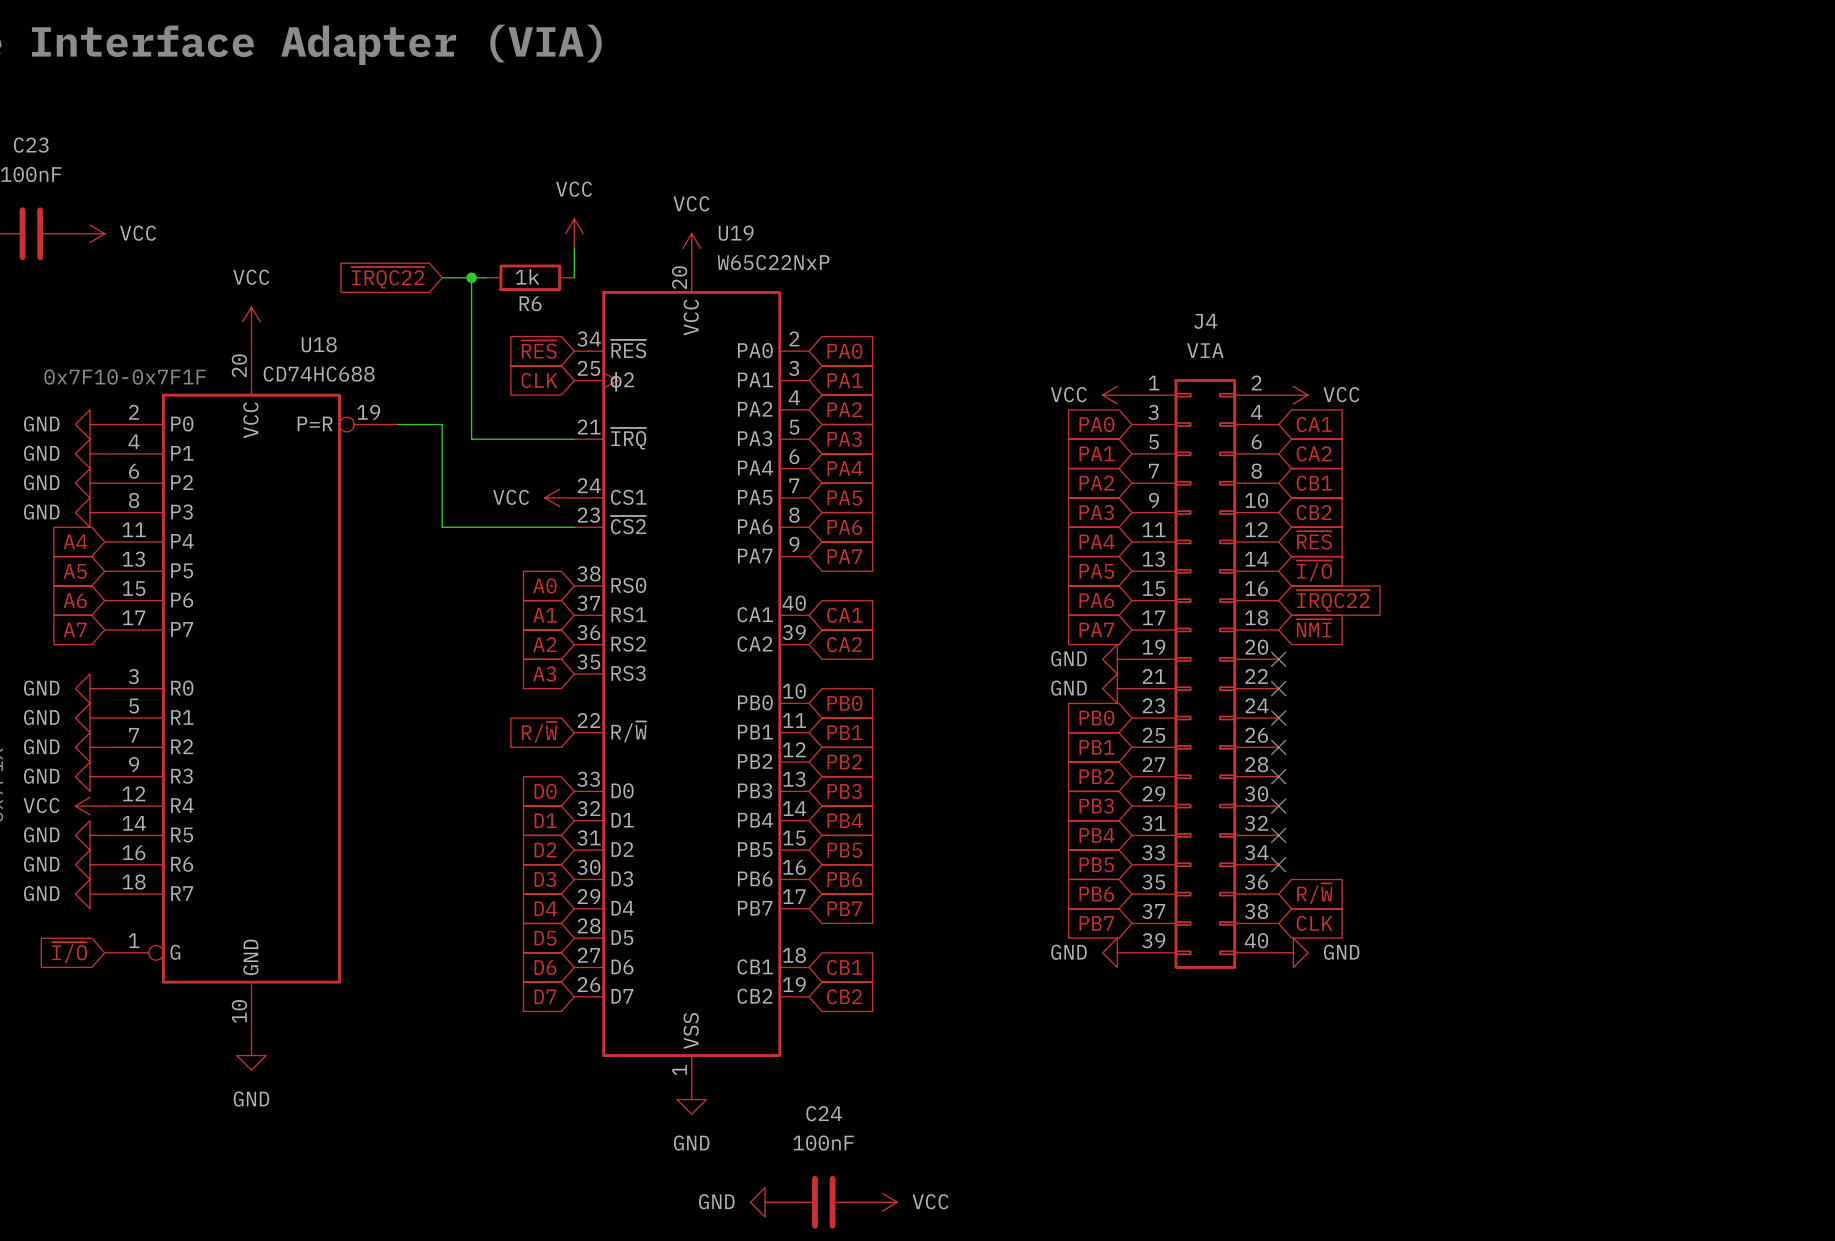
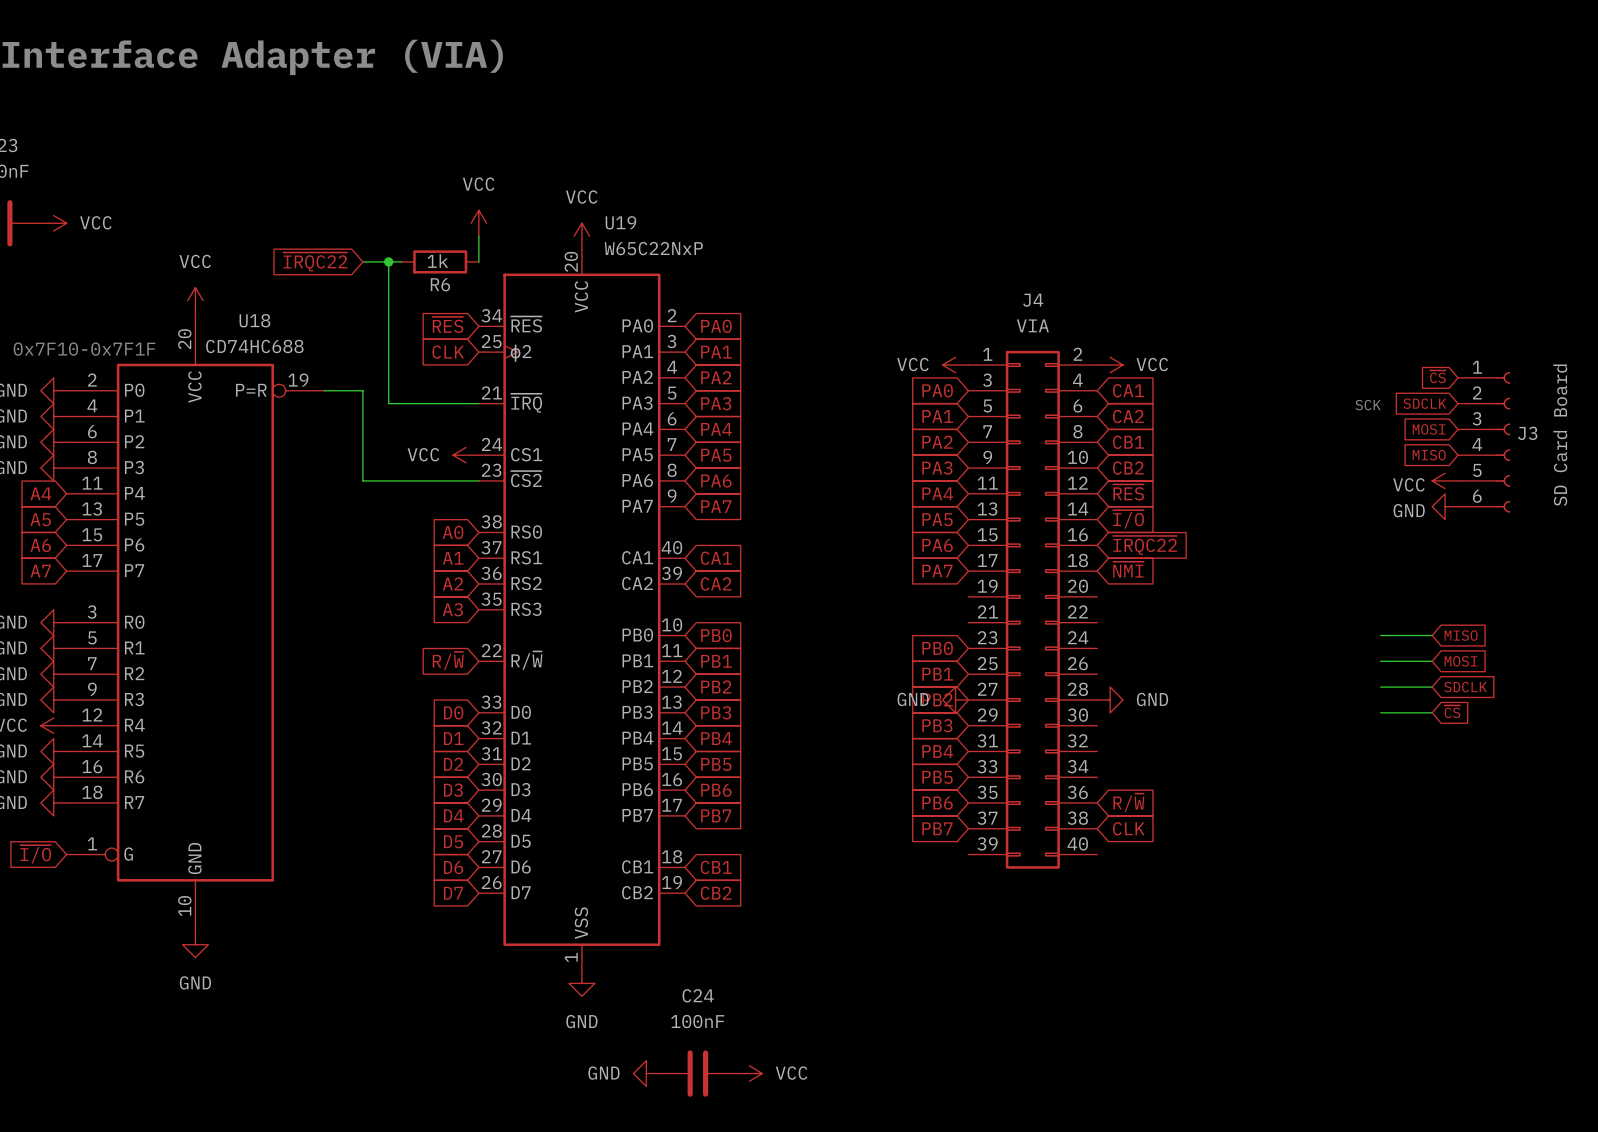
global label: none -> ~{CS} (1437, 376)
global label: none -> SDCLK (1424, 403)
text: none -> SCK (1368, 405)
global label: none -> MOSI (1429, 429)
J3: none -> SD Card Board (1484, 442)
global label: none -> MISO (1429, 455)
power symbol: none -> VCC (1445, 480)
power symbol: none -> GND (1445, 506)
power symbol: GND (1117, 659) -> none
no-connect mark: (1278, 659) -> none
power symbol: GND (1117, 688) -> none
no-connect mark: (1278, 688) -> none
wire: none -> (1380, 635) (1432, 635)
global label: none -> MISO (1461, 635)
no-connect mark: (1278, 718) -> none
wire: none -> (1380, 661) (1432, 661)
global label: none -> MOSI (1460, 661)
no-connect mark: (1278, 747) -> none
wire: none -> (1380, 687) (1432, 687)
global label: none -> SDCLK (1465, 687)
power symbol: none -> GND (955, 699)
no-connect mark: (1278, 776) -> none
power symbol: none -> GND (1110, 699)
global label: none -> ~{CS} (1452, 711)
wire: none -> (1380, 712) (1432, 712)
no-connect mark: (1278, 806) -> none
no-connect mark: (1278, 835) -> none
no-connect mark: (1278, 864) -> none
power symbol: GND (1117, 952) -> none
power symbol: GND (1293, 952) -> none

